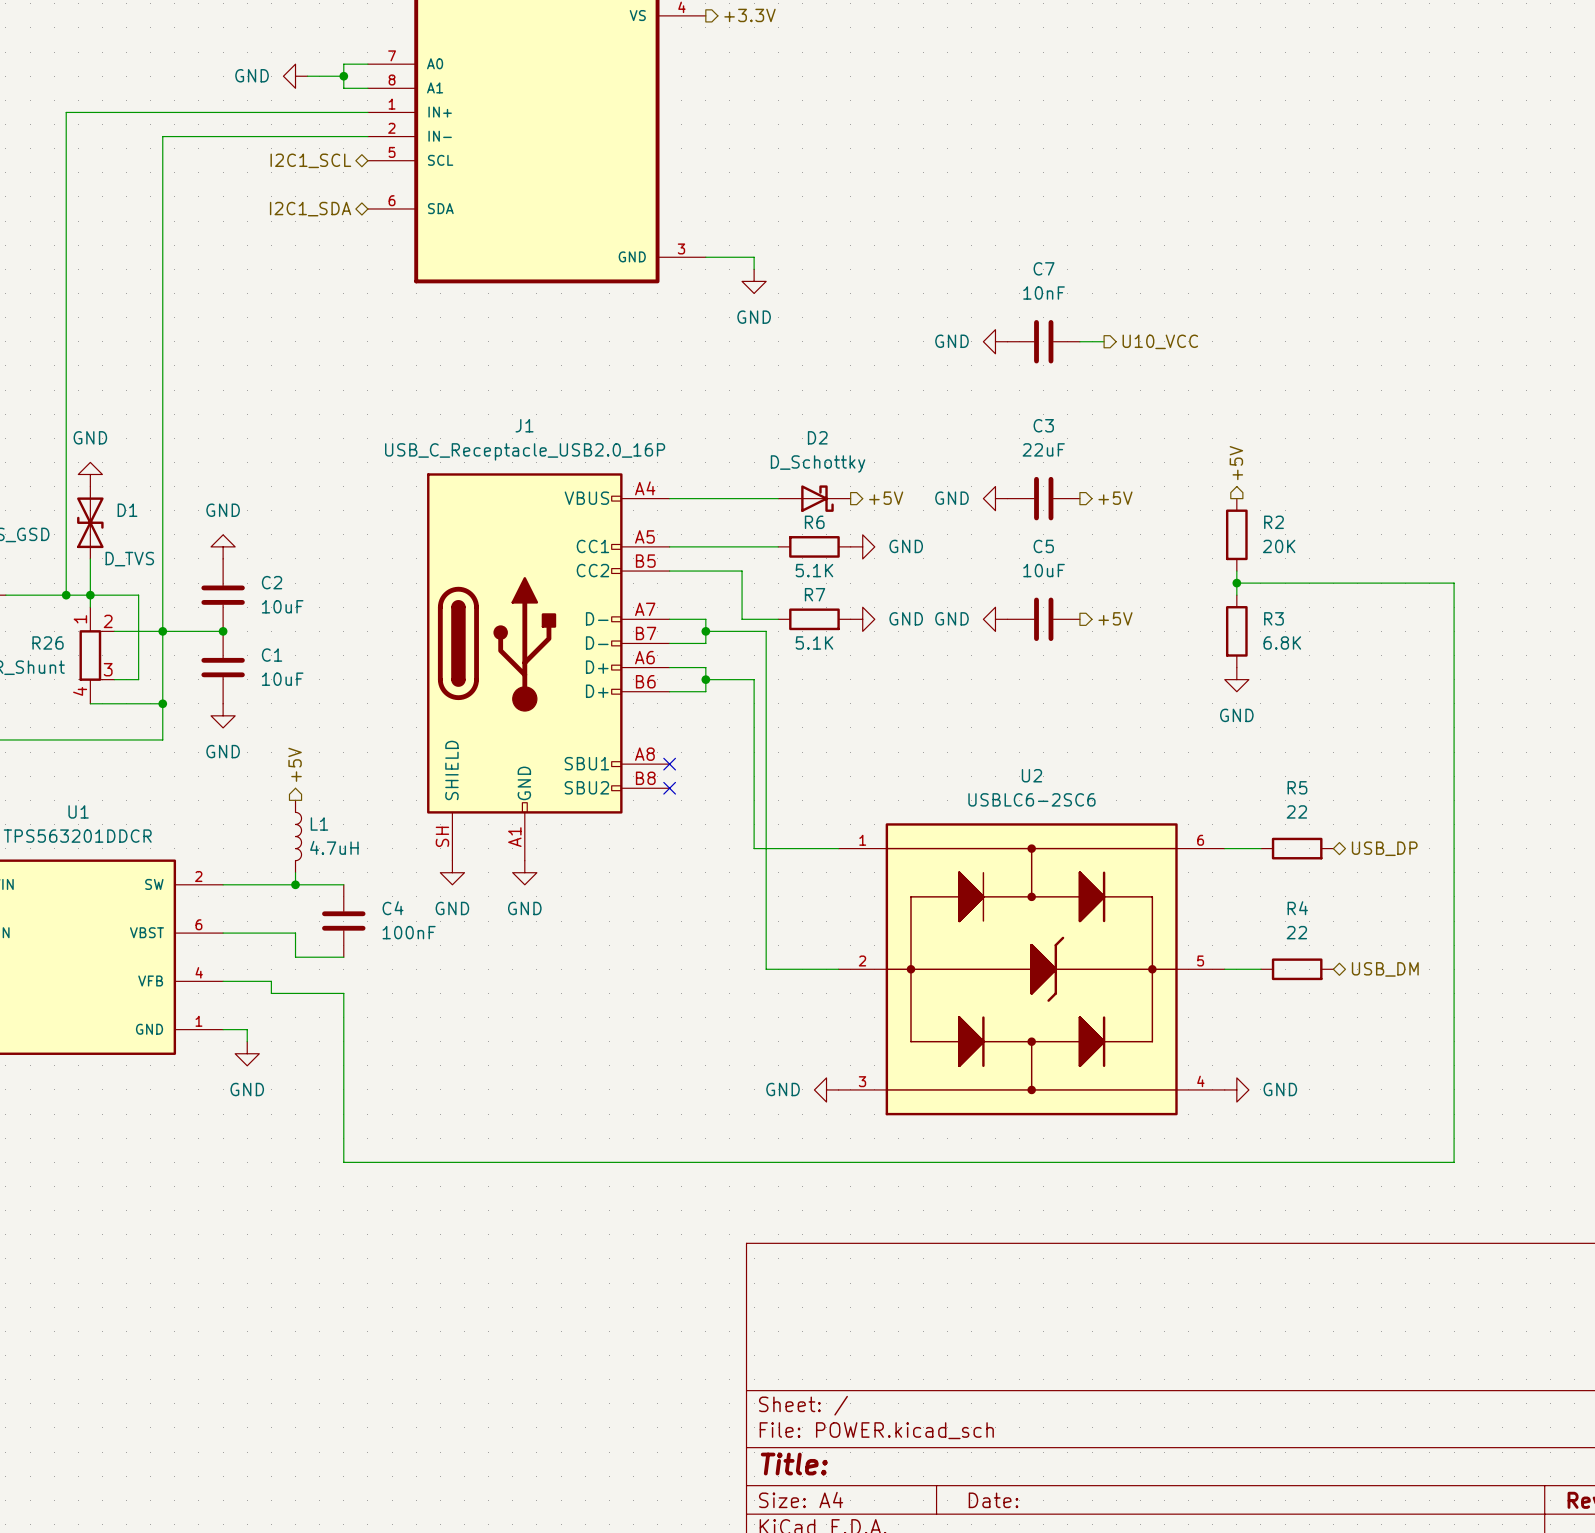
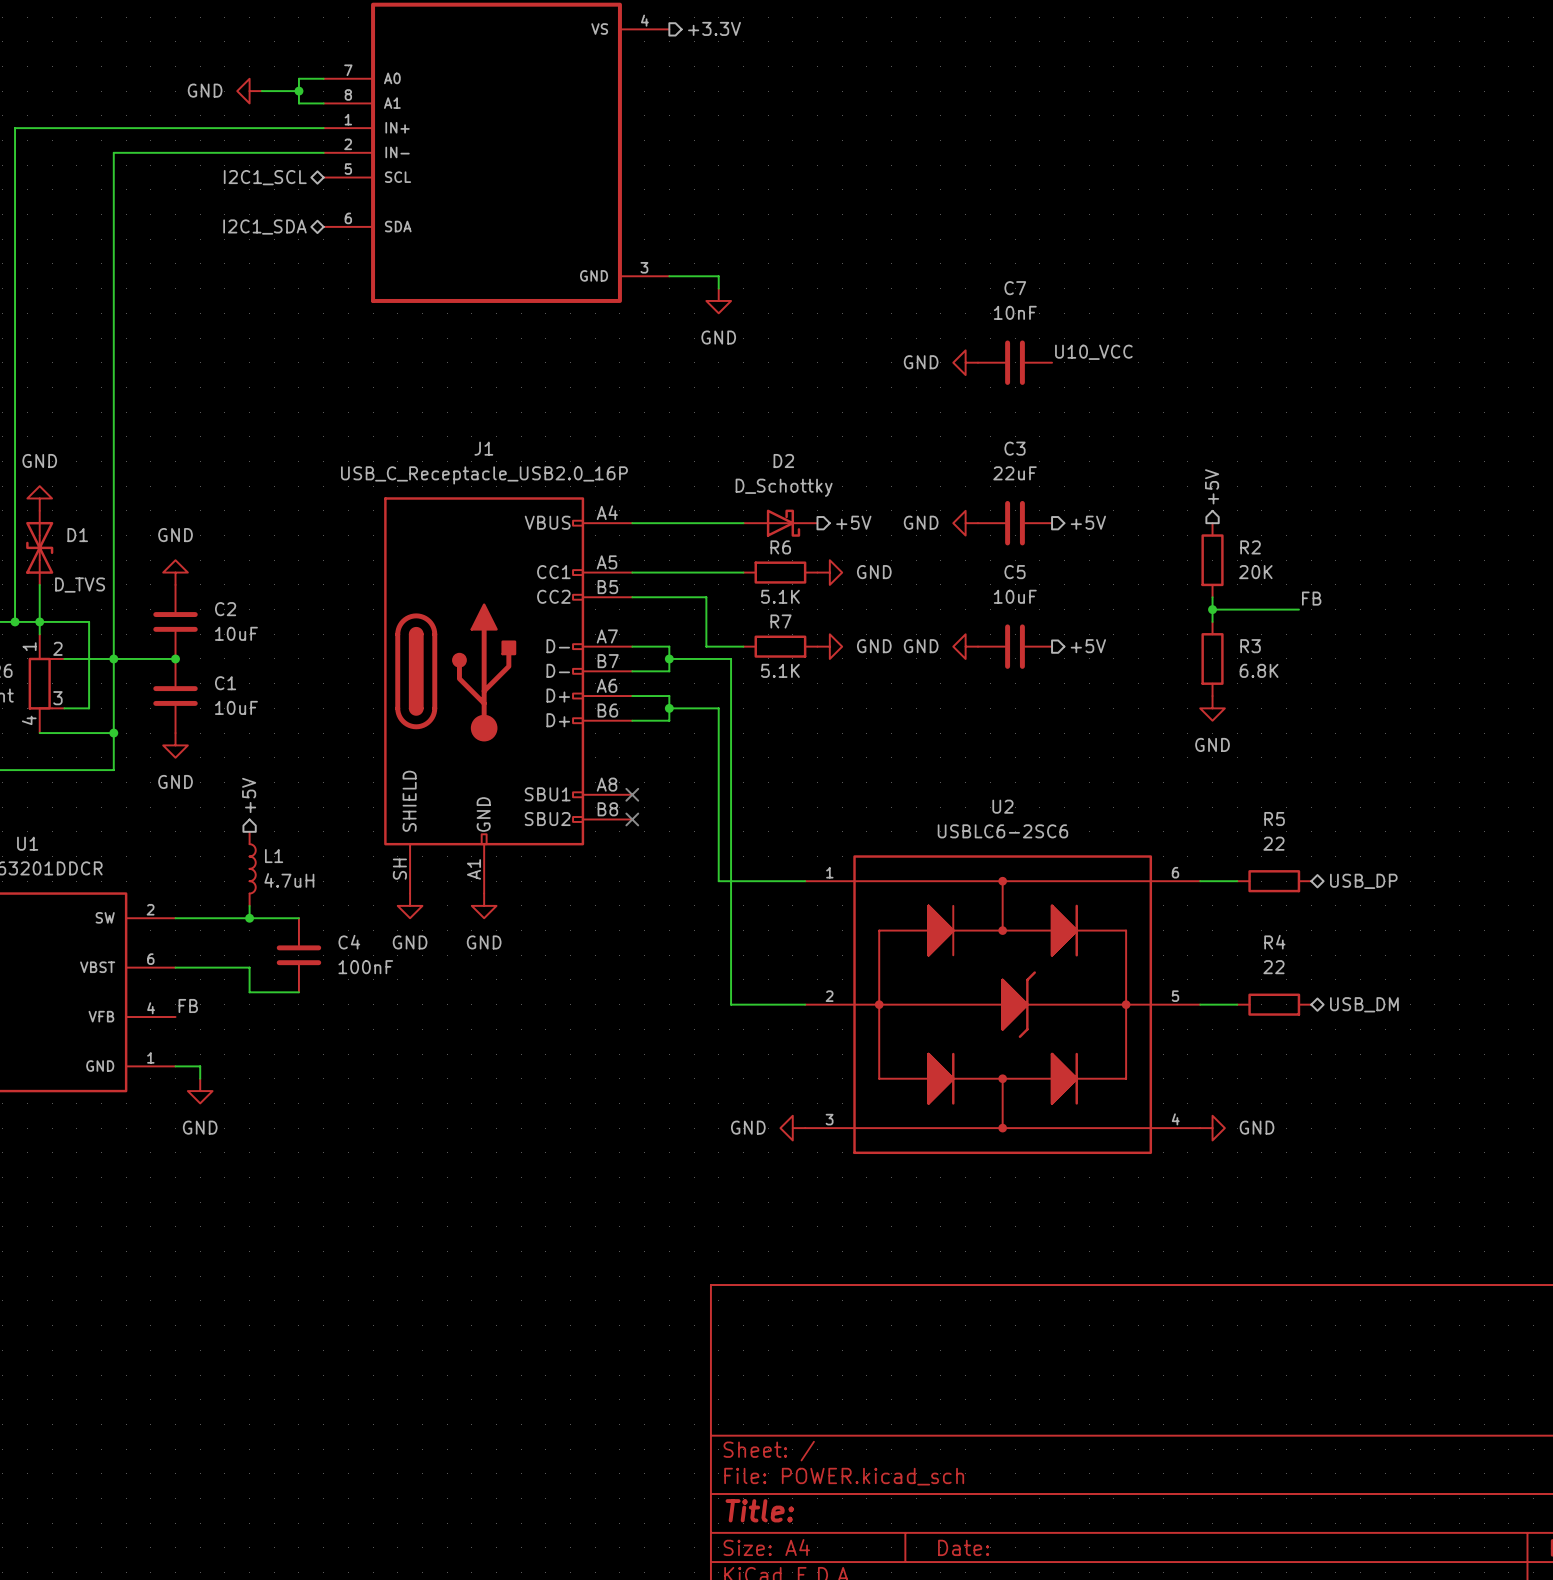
label: none -> U10_VCC (1093, 352)
wire: (1079, 341) (1104, 341) -> none
hierarchical label: U10_VCC (1160, 341) -> none
label: none -> FB (1311, 598)
wire: (1321, 583) (1454, 583) (1454, 1162) (343, 1162) (343, 993) (271, 993) (271, 981) (223, 981) -> none
label: none -> FB (188, 1005)

